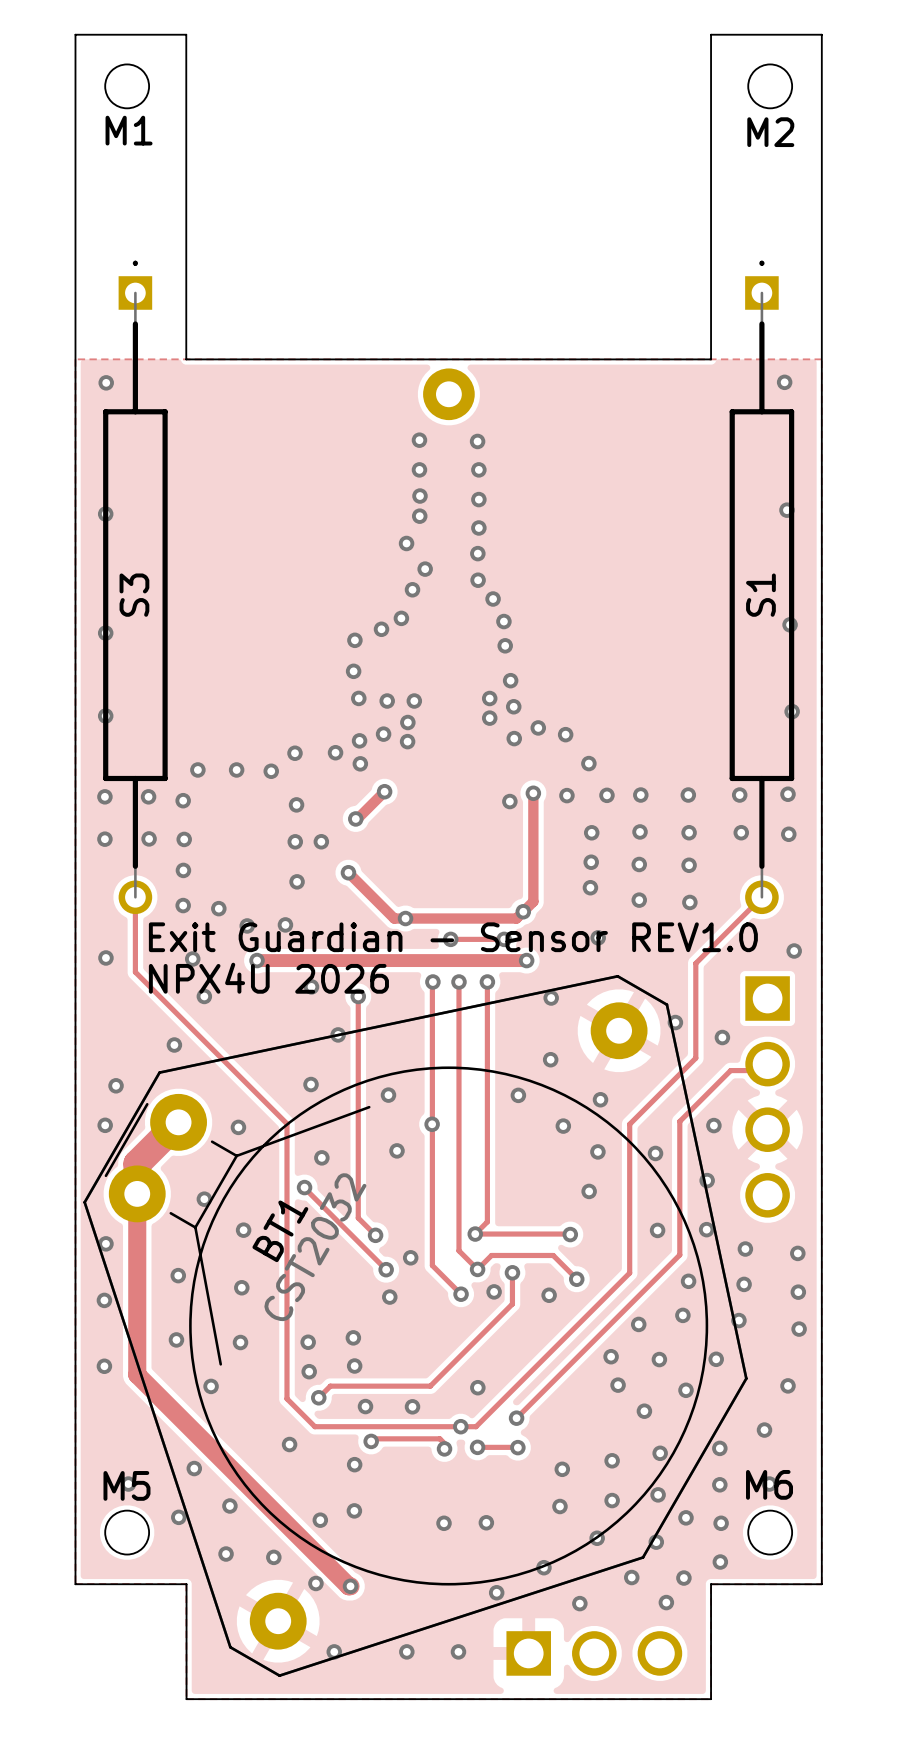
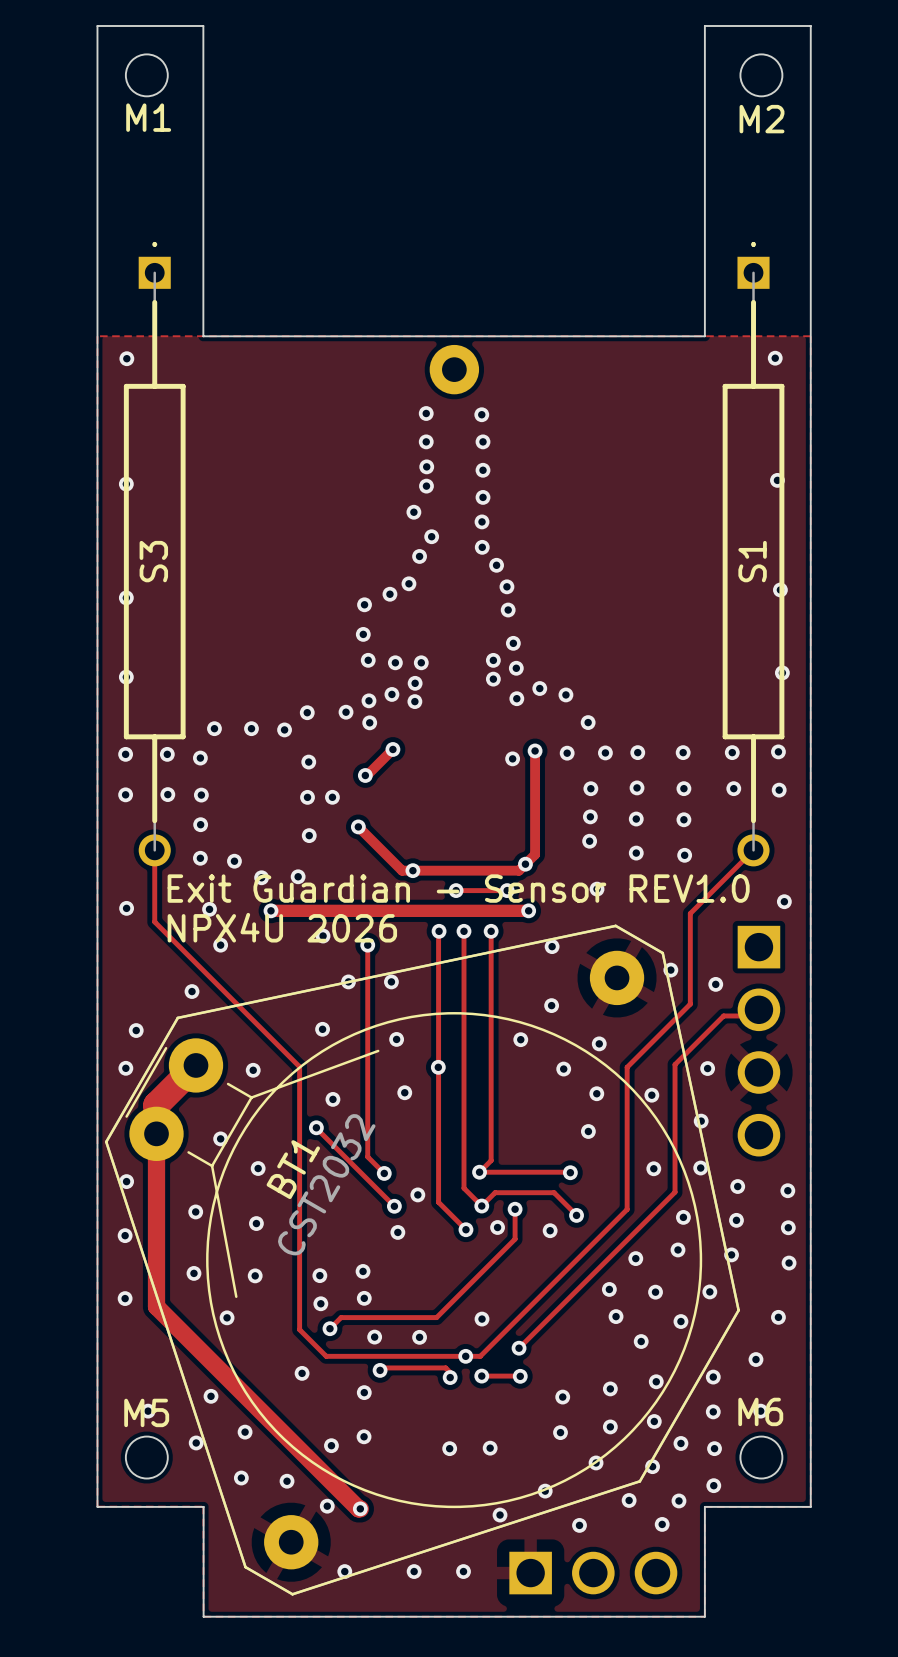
via: none -> (391, 981)

